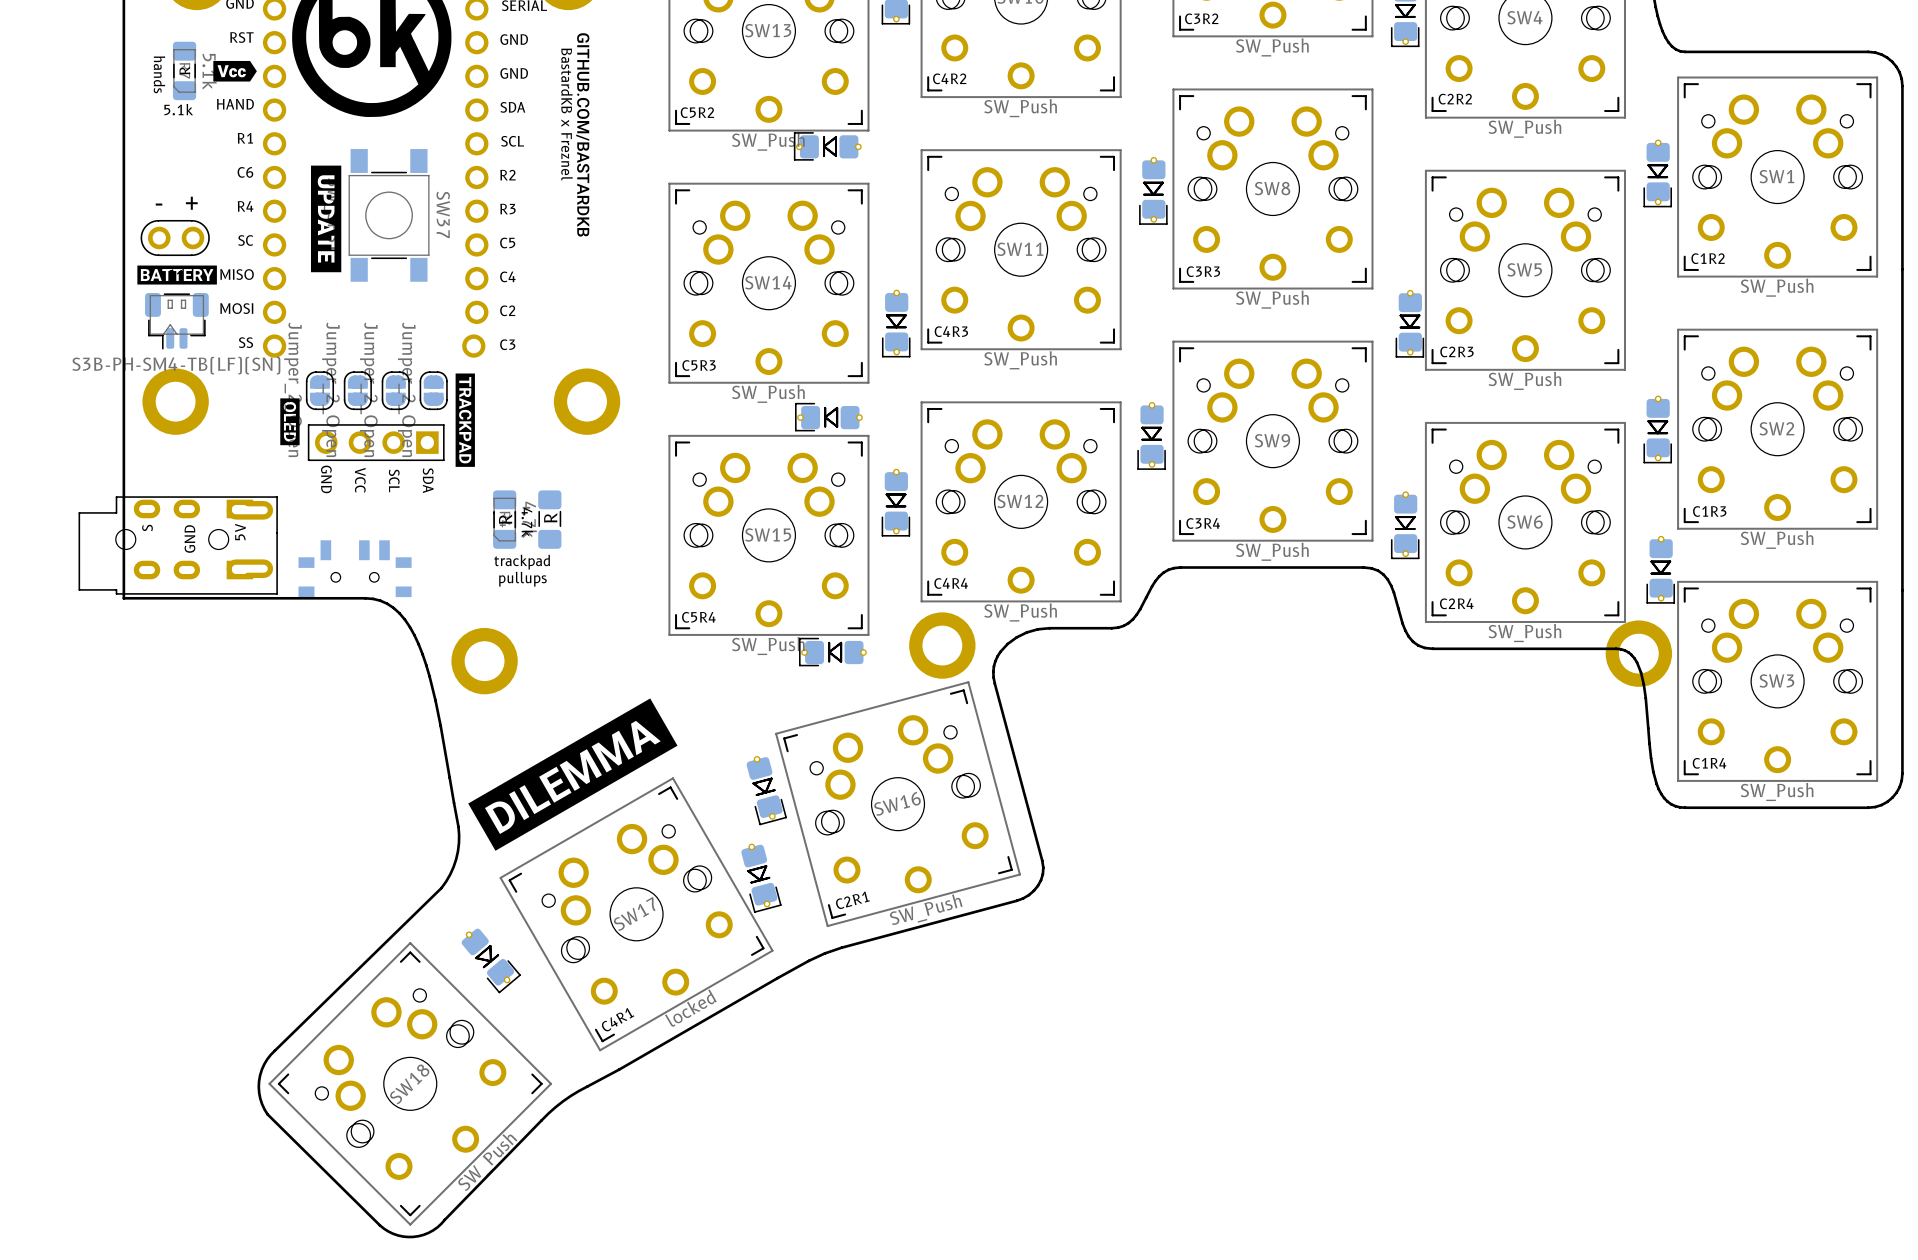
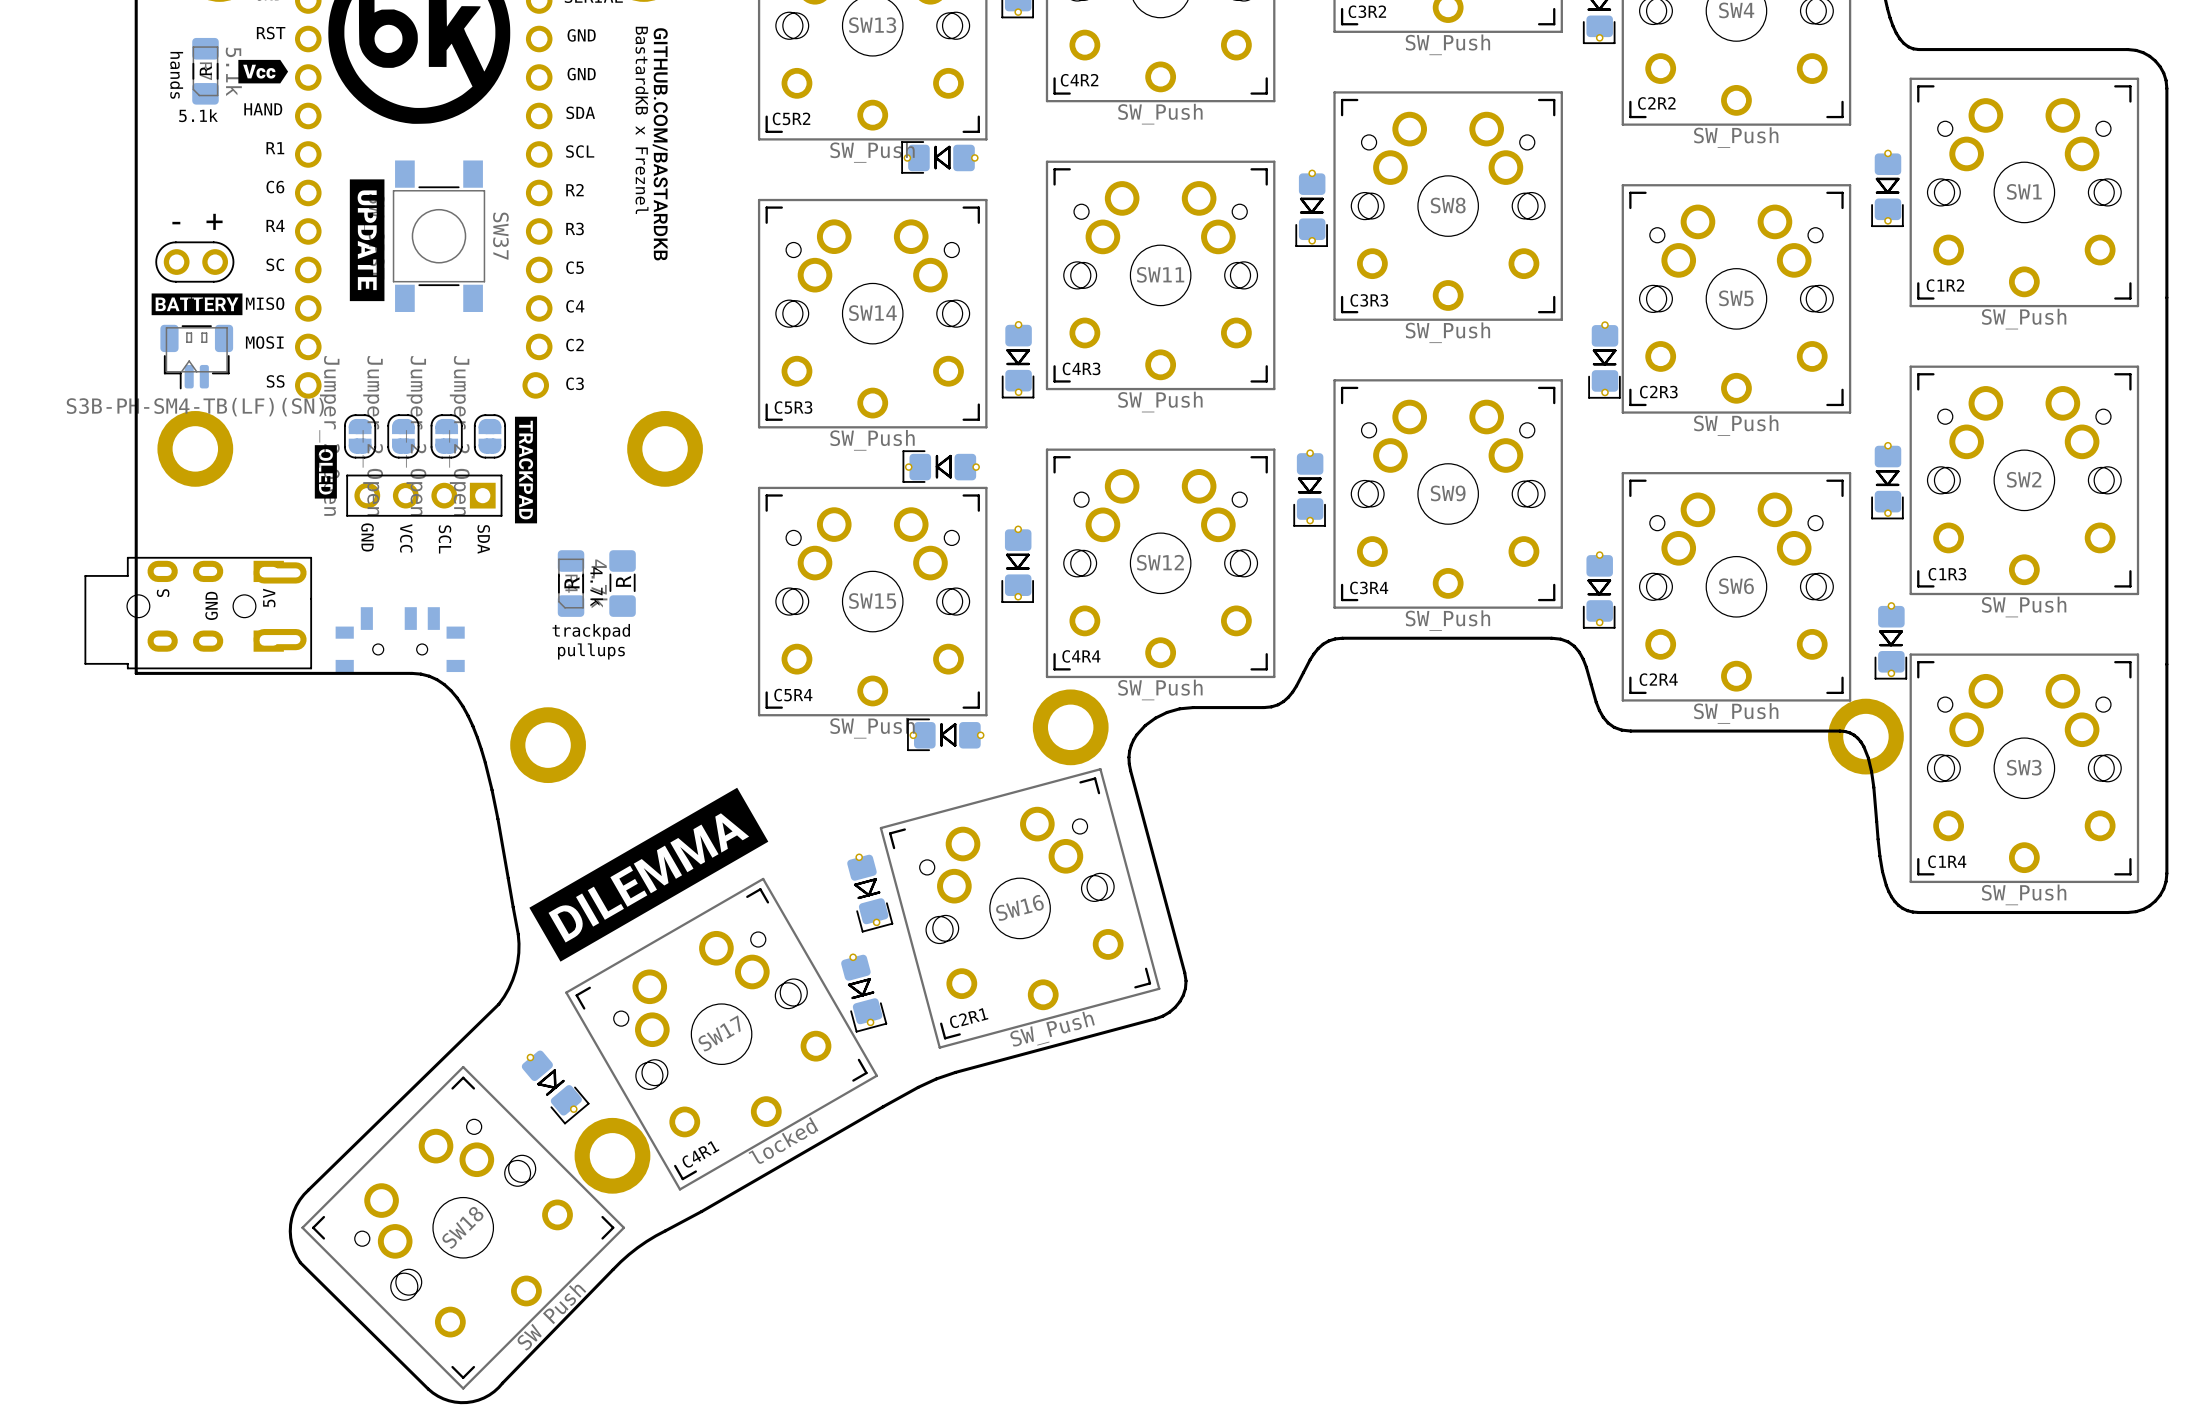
part: none -> (612, 1155)

